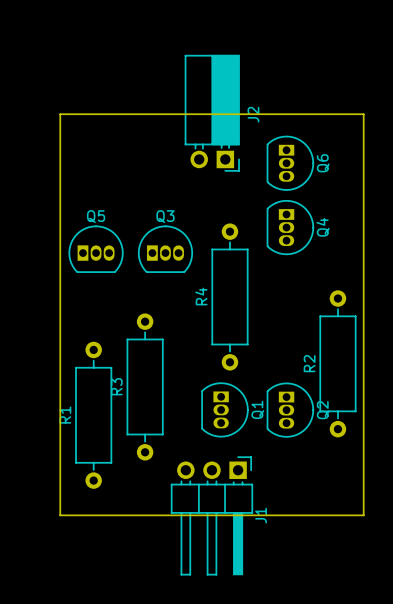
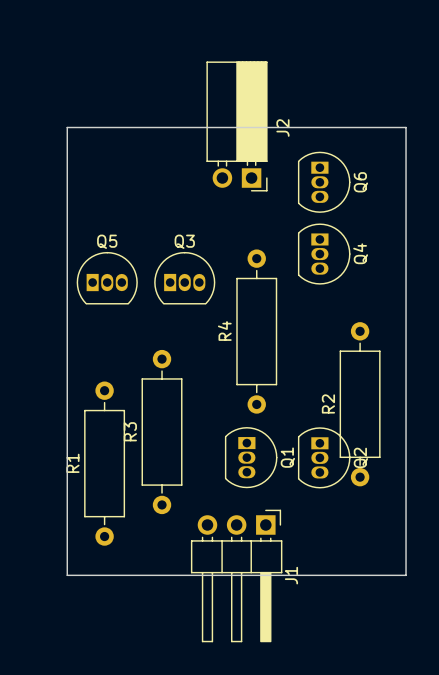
R2 position: (337, 363) -> (360, 404)

